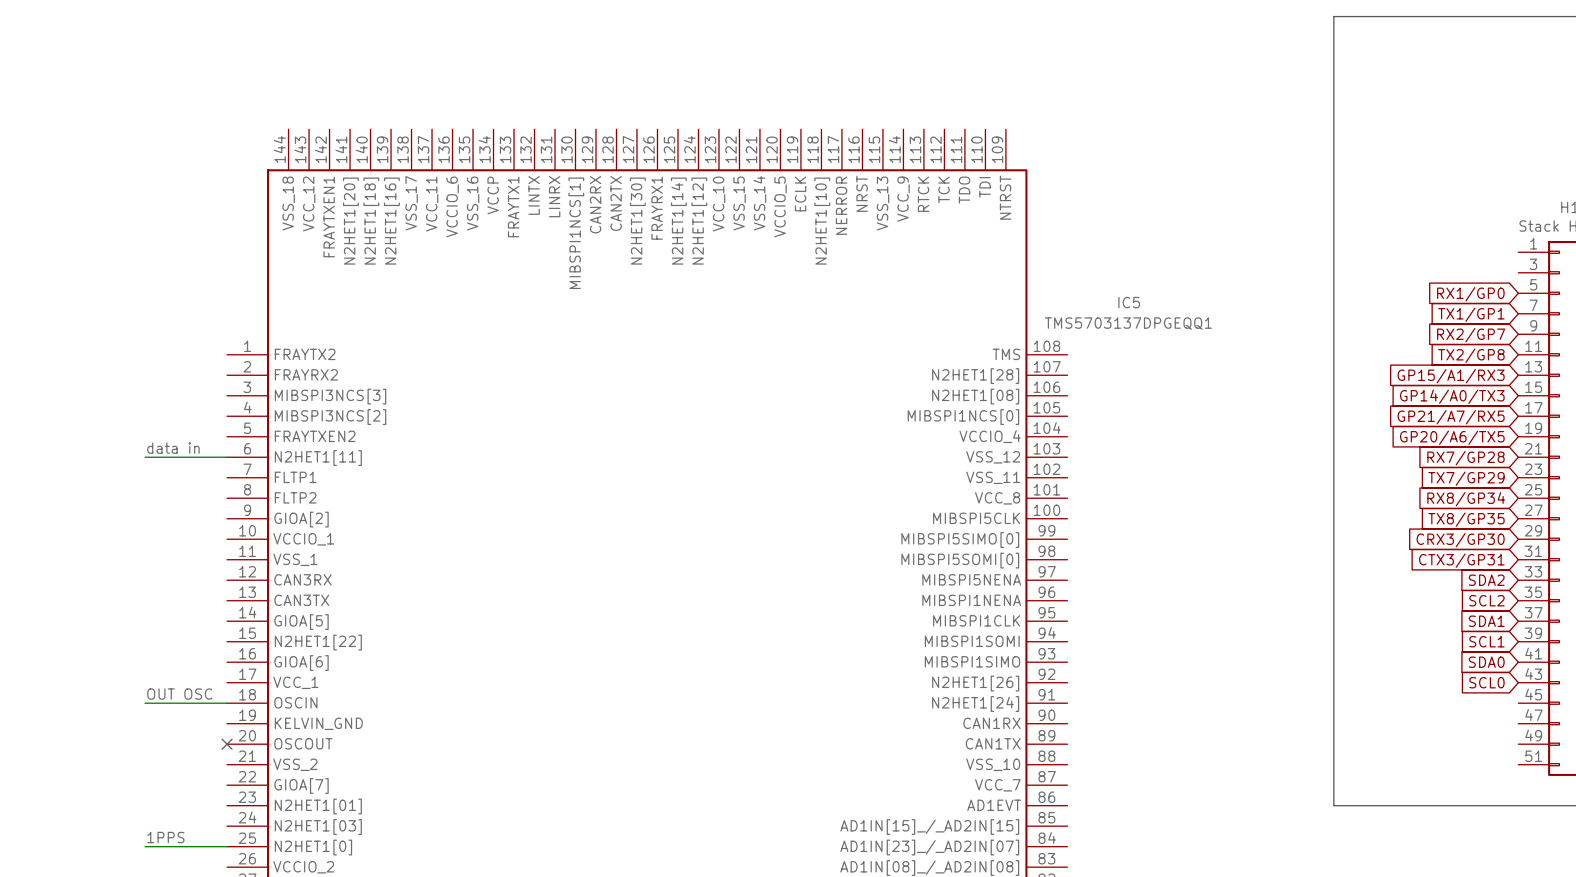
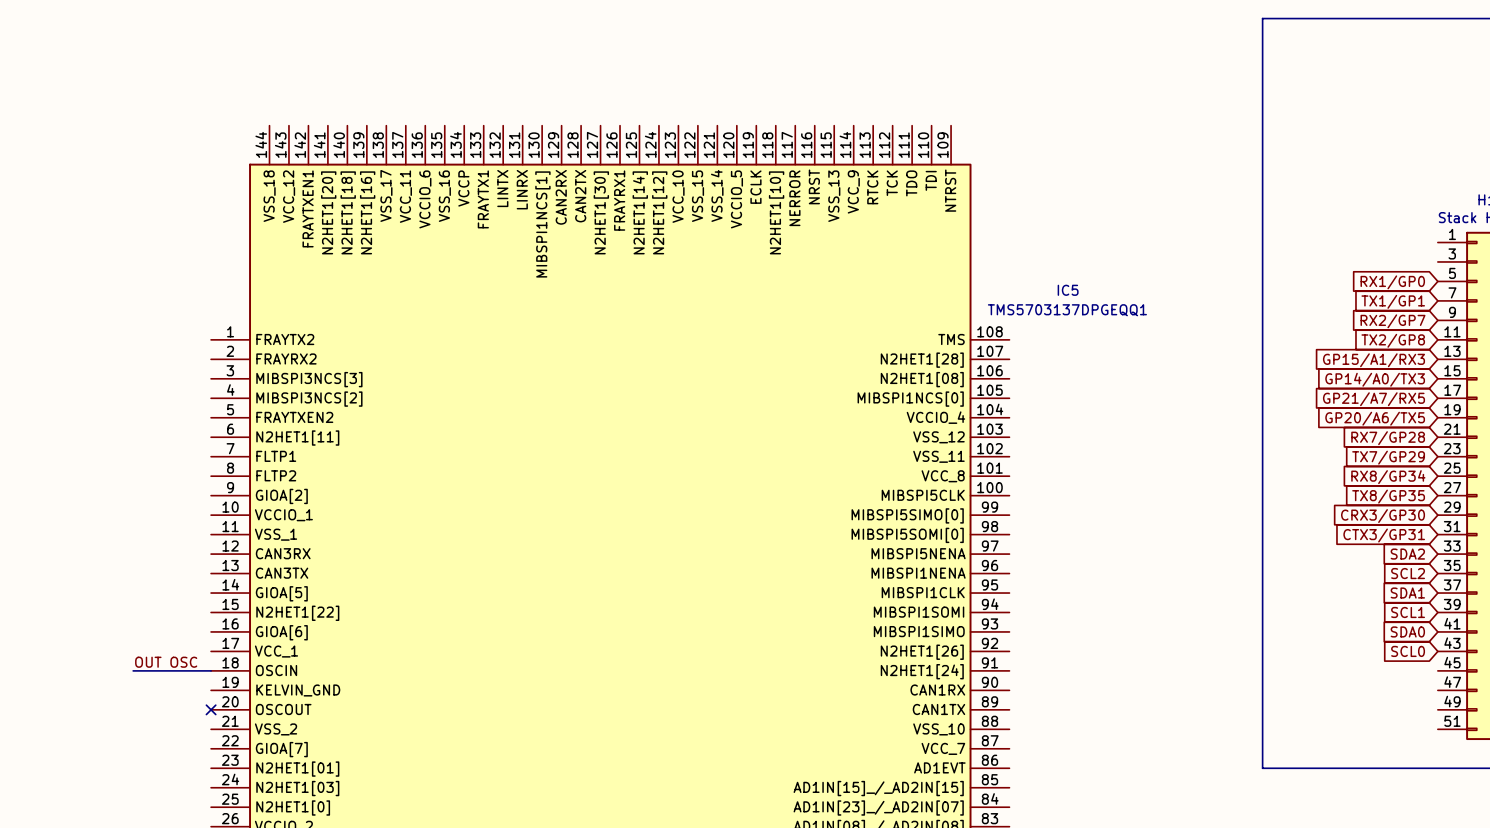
label: data in (173, 448) -> none
wire: (145, 457) (227, 457) -> none
label: 1PPS (165, 837) -> none
wire: (145, 846) (227, 846) -> none

